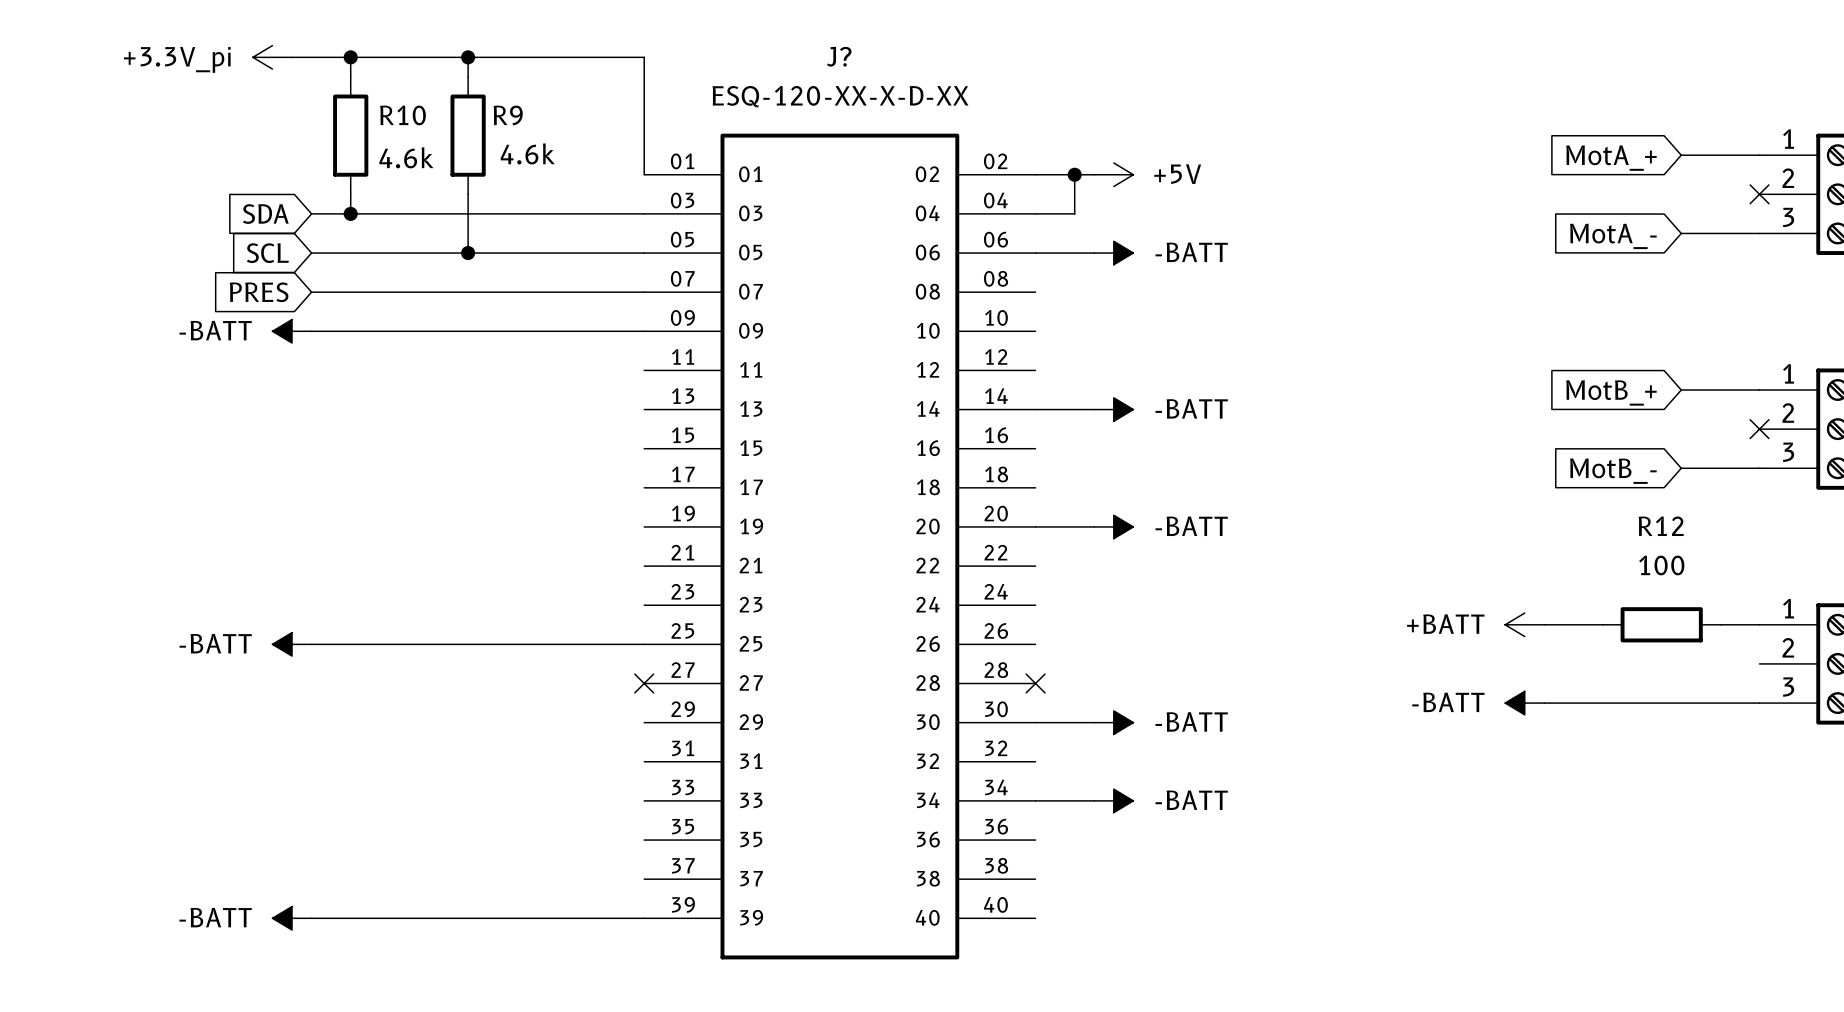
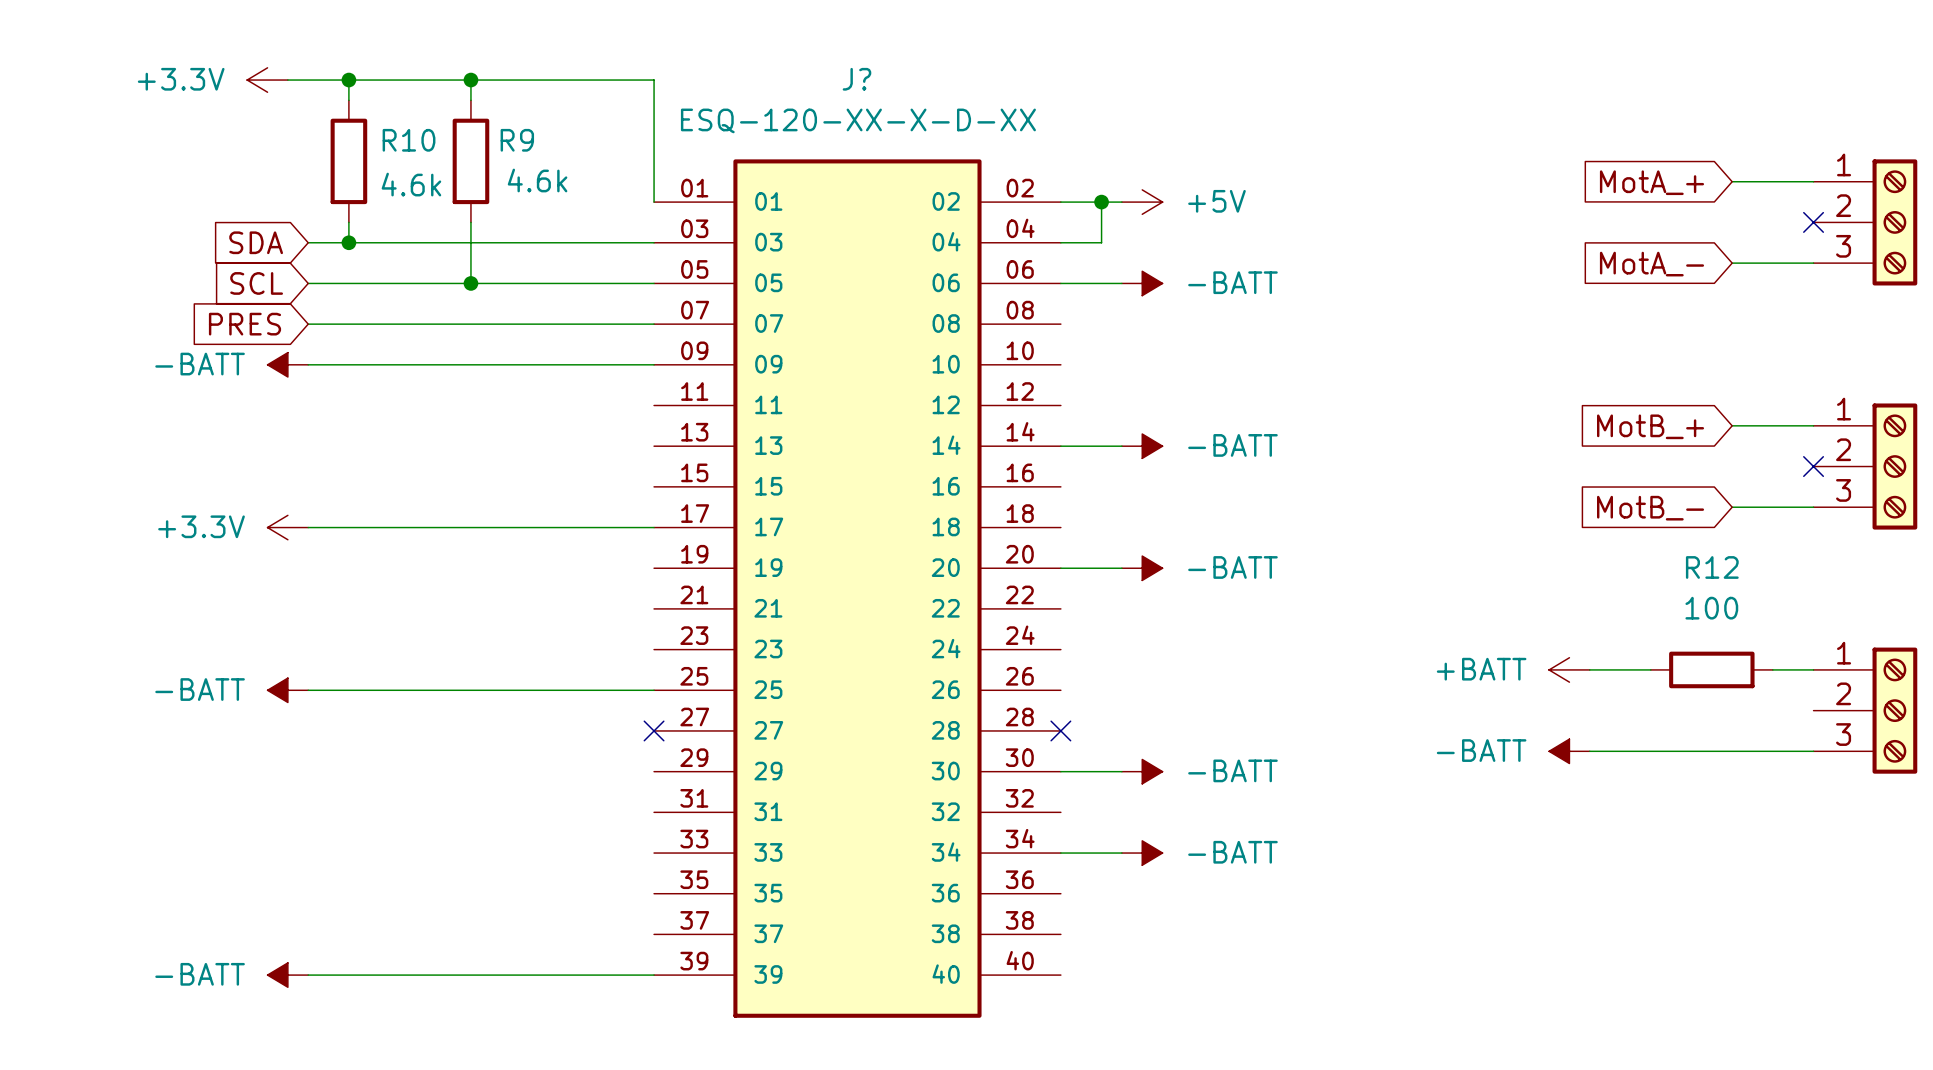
power symbol: +3.3V_pi (272, 57) -> +3.3V (267, 80)
power symbol: none -> +3.3V (287, 527)
wire: none -> (308, 527) (654, 527)

